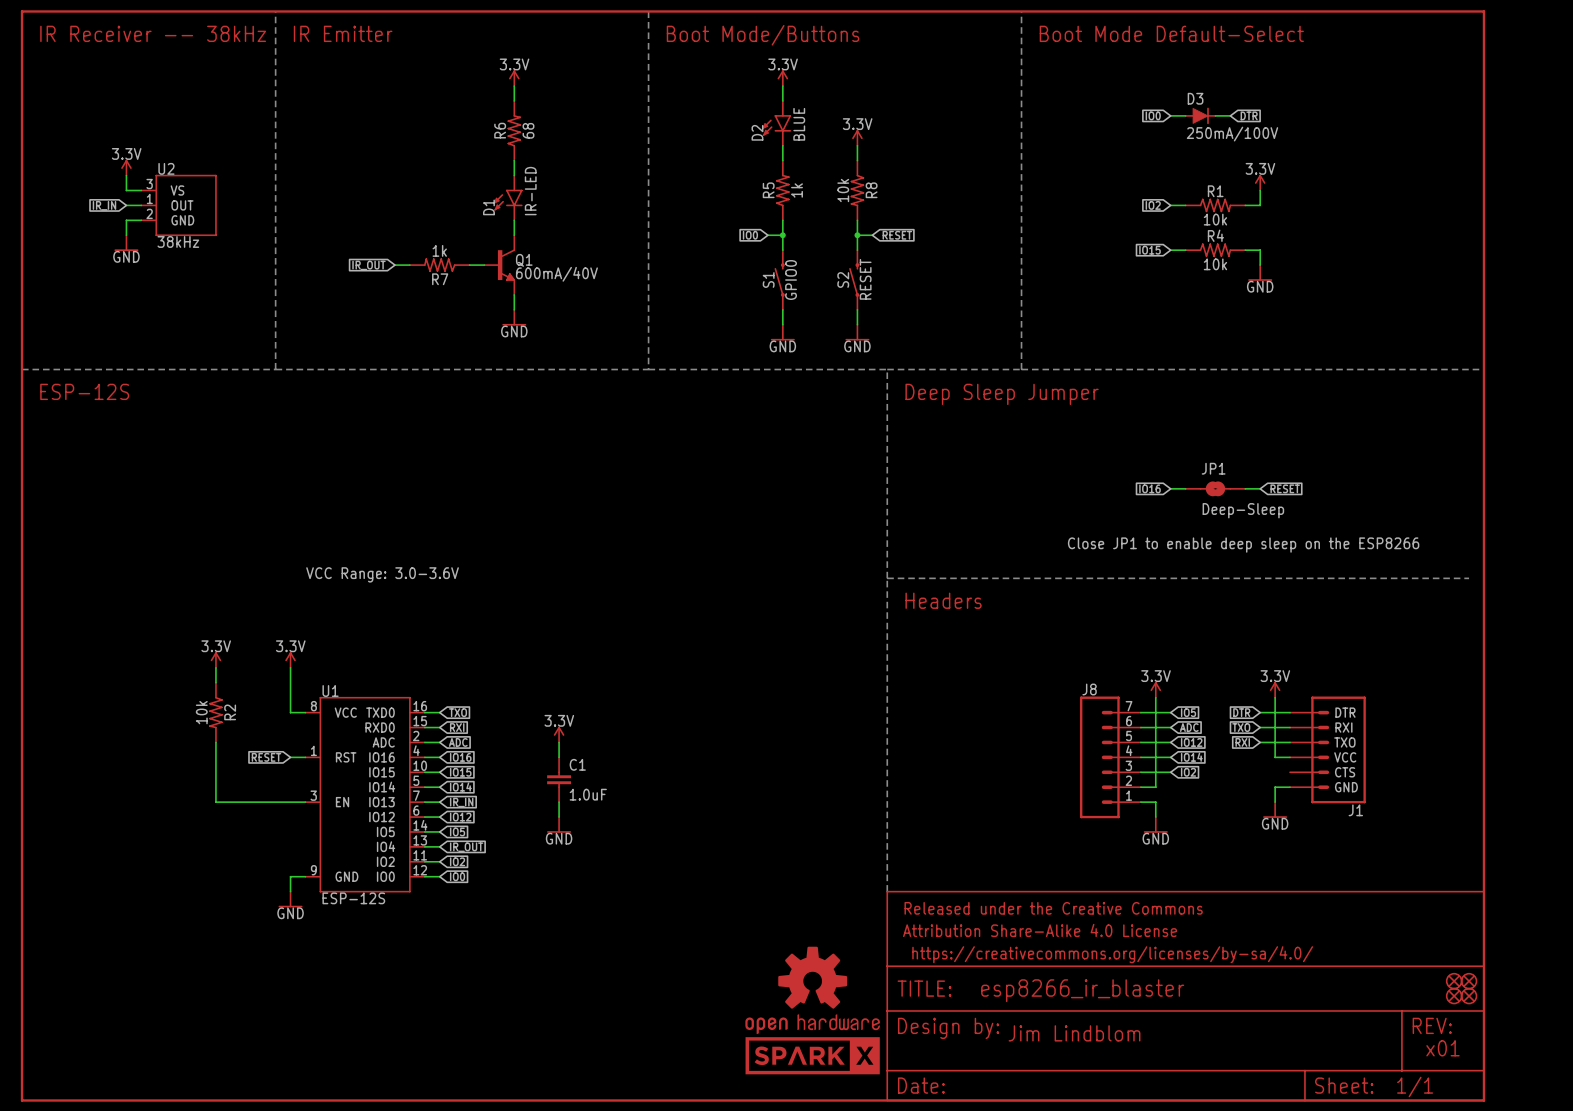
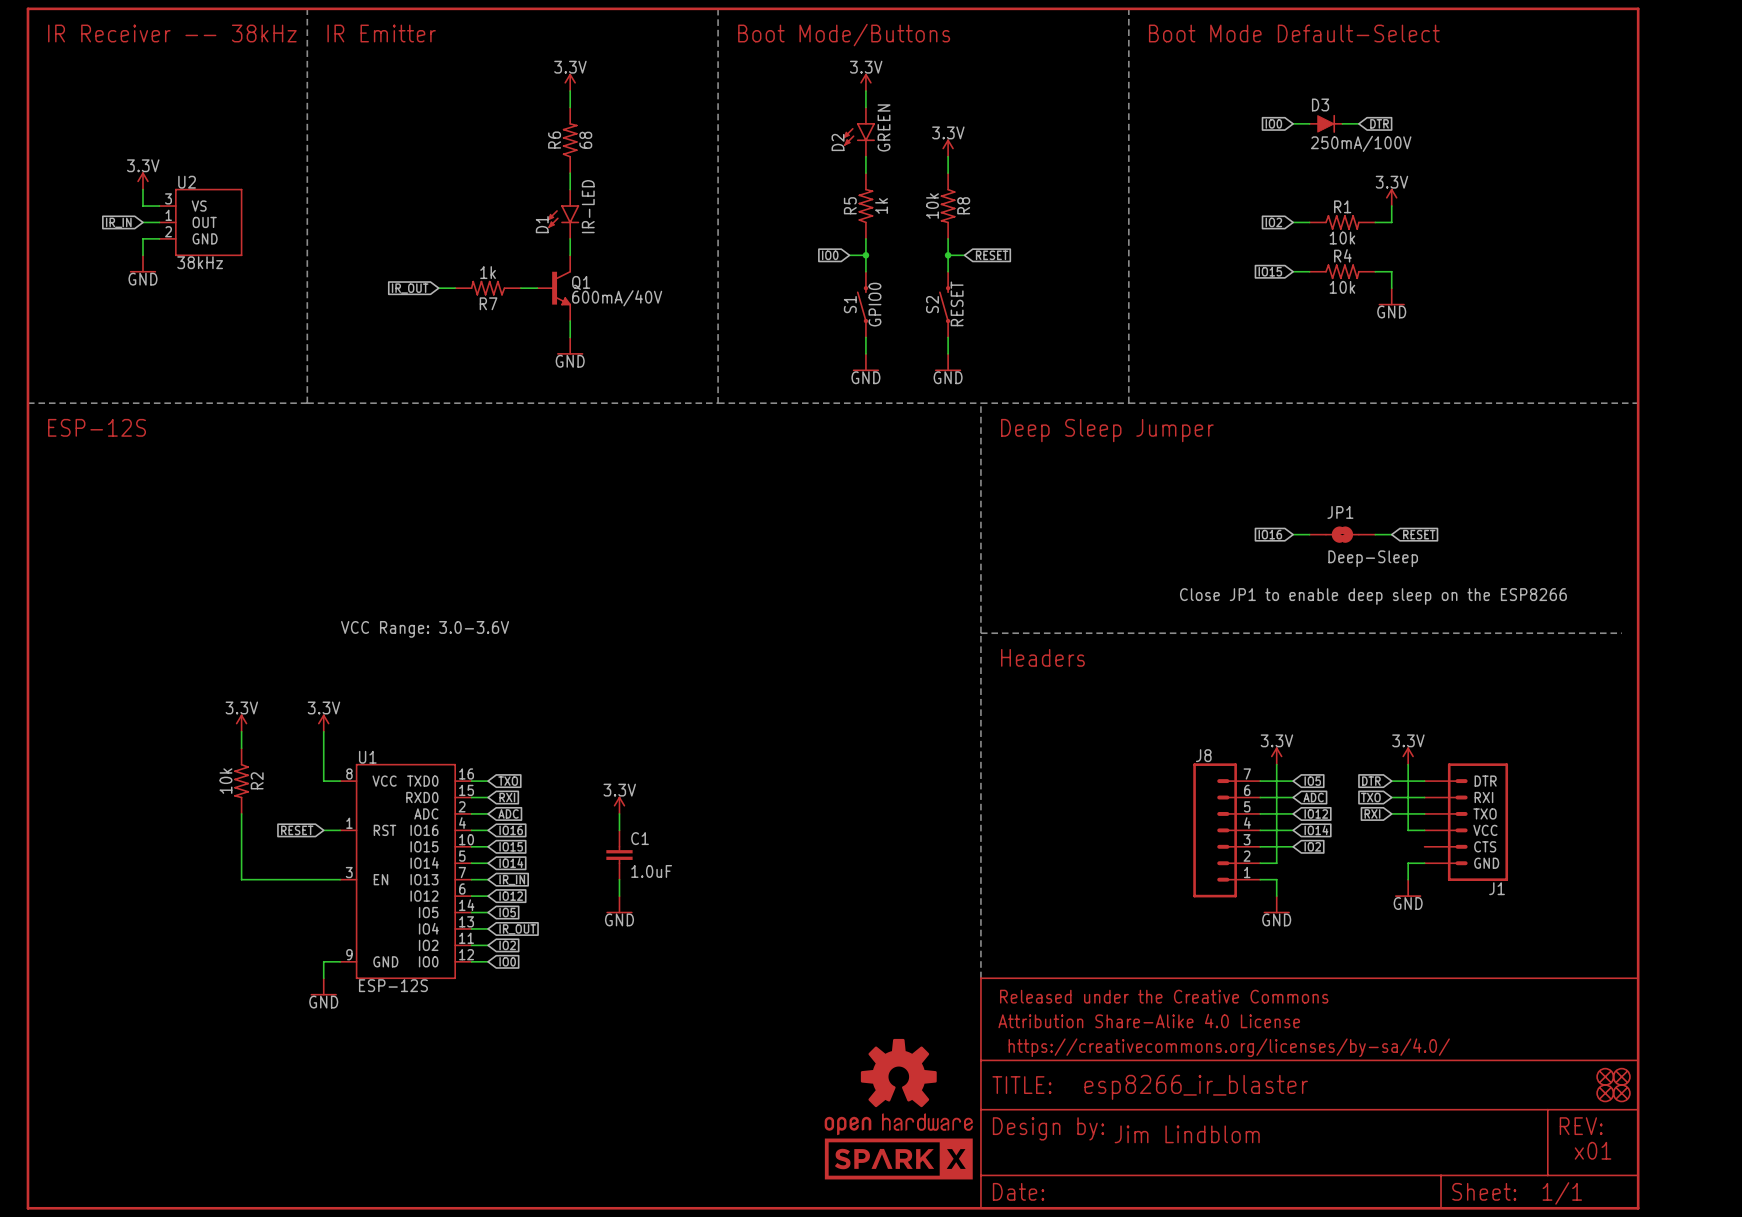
D2 value: BLUE (799, 124) -> GREEN (884, 127)

